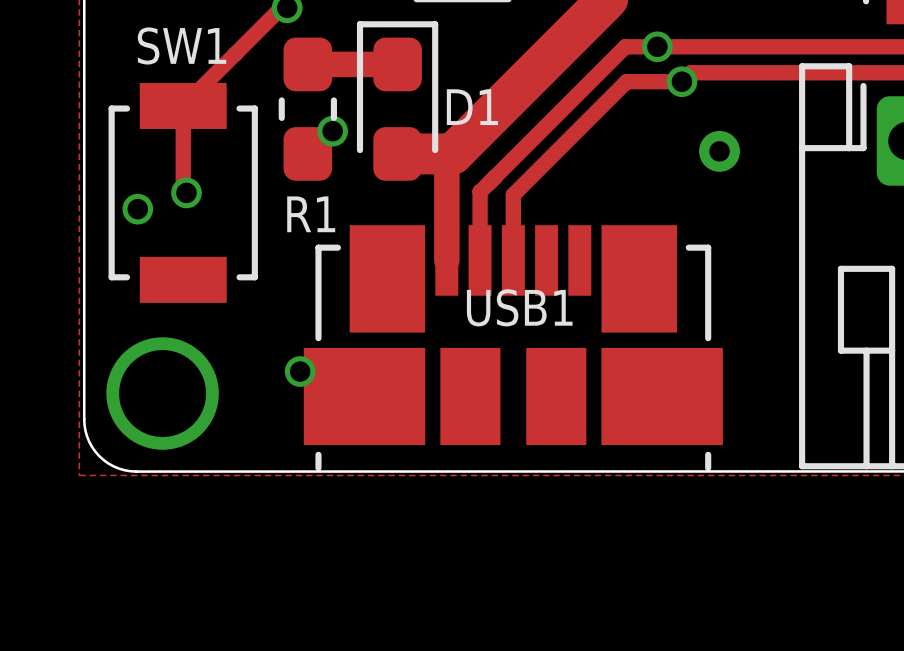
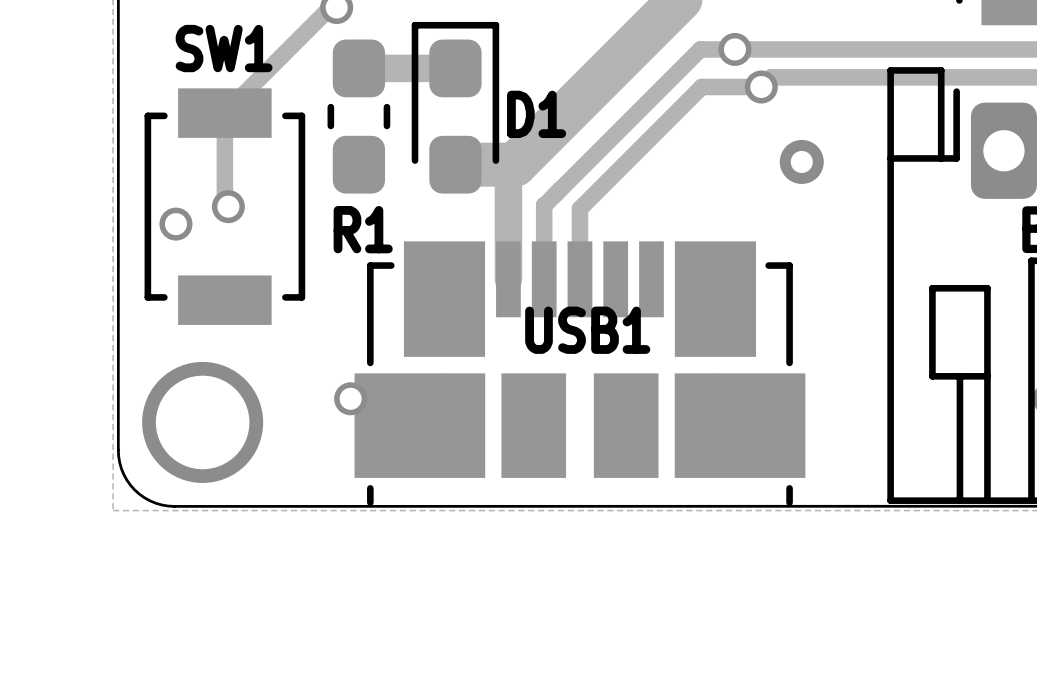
via: (332, 131) -> none

